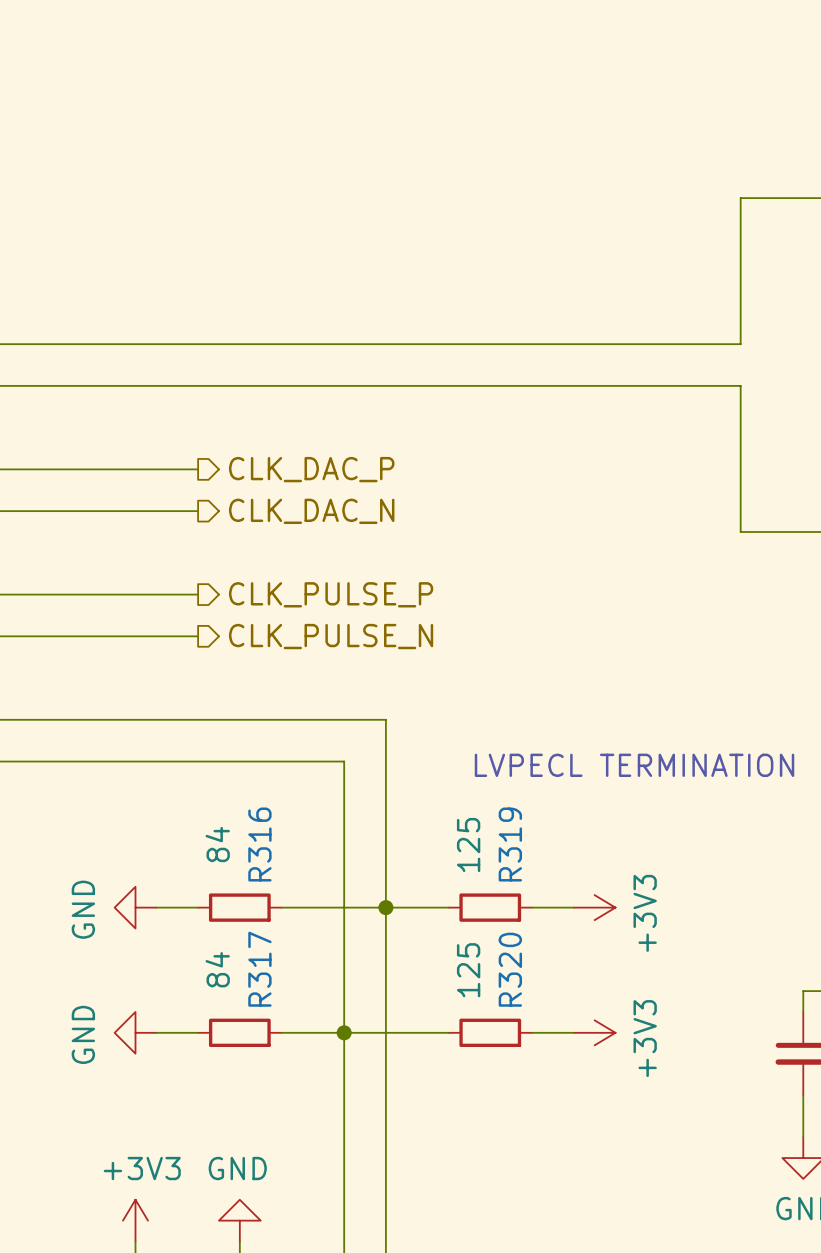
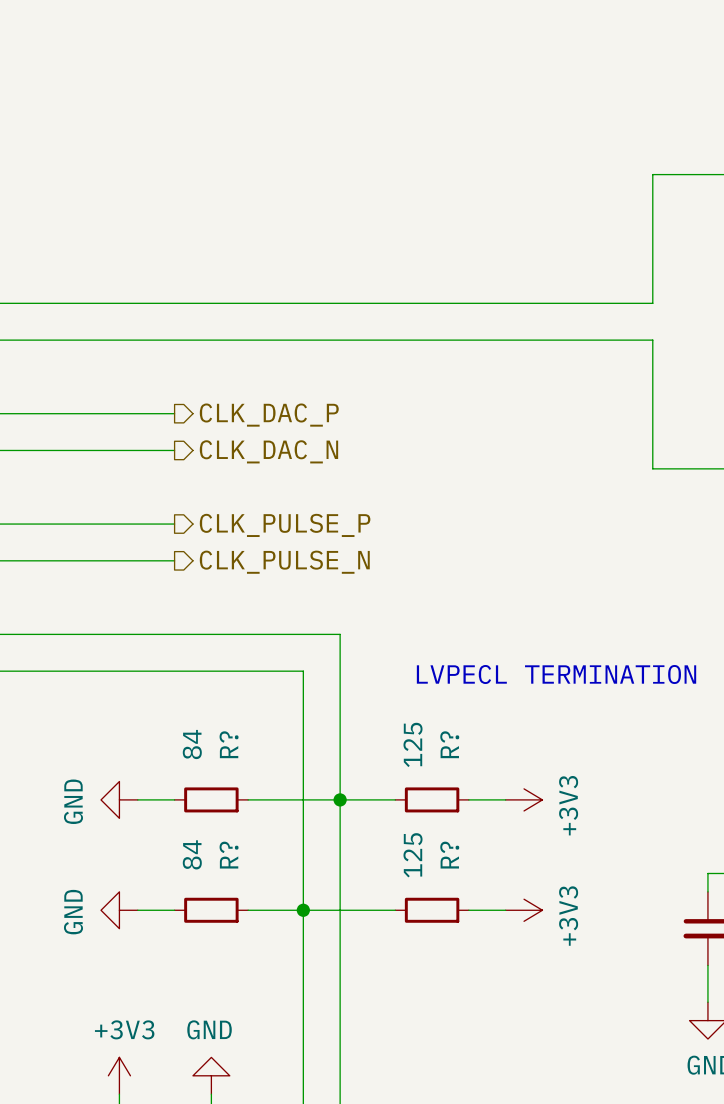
R316 name: R316 (259, 844) -> R? (229, 744)
R319 name: R319 (510, 844) -> R? (449, 744)
R317 name: R317 (259, 969) -> R? (229, 855)
R320 name: R320 (510, 969) -> R? (449, 855)

